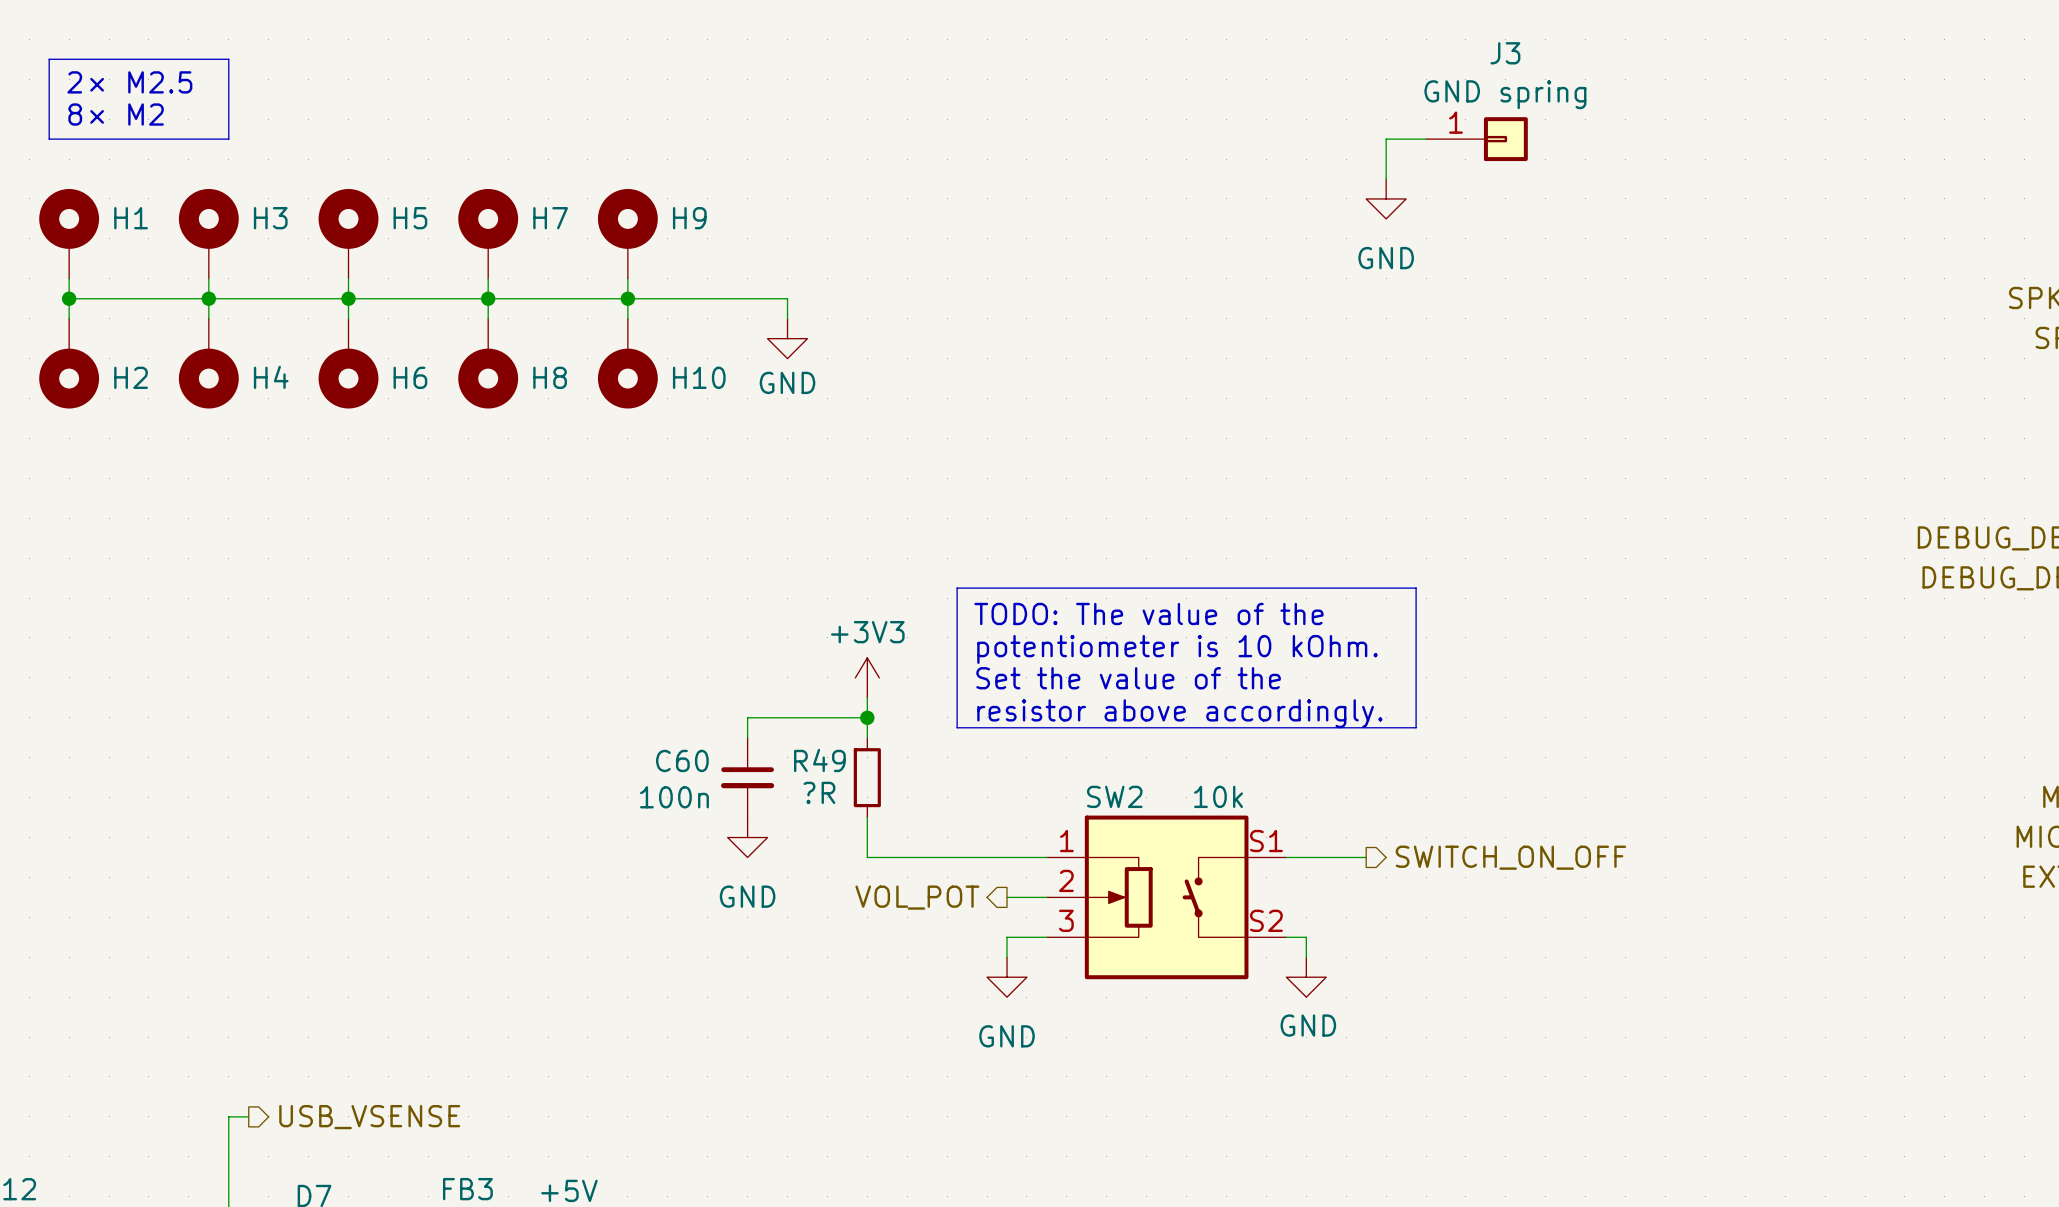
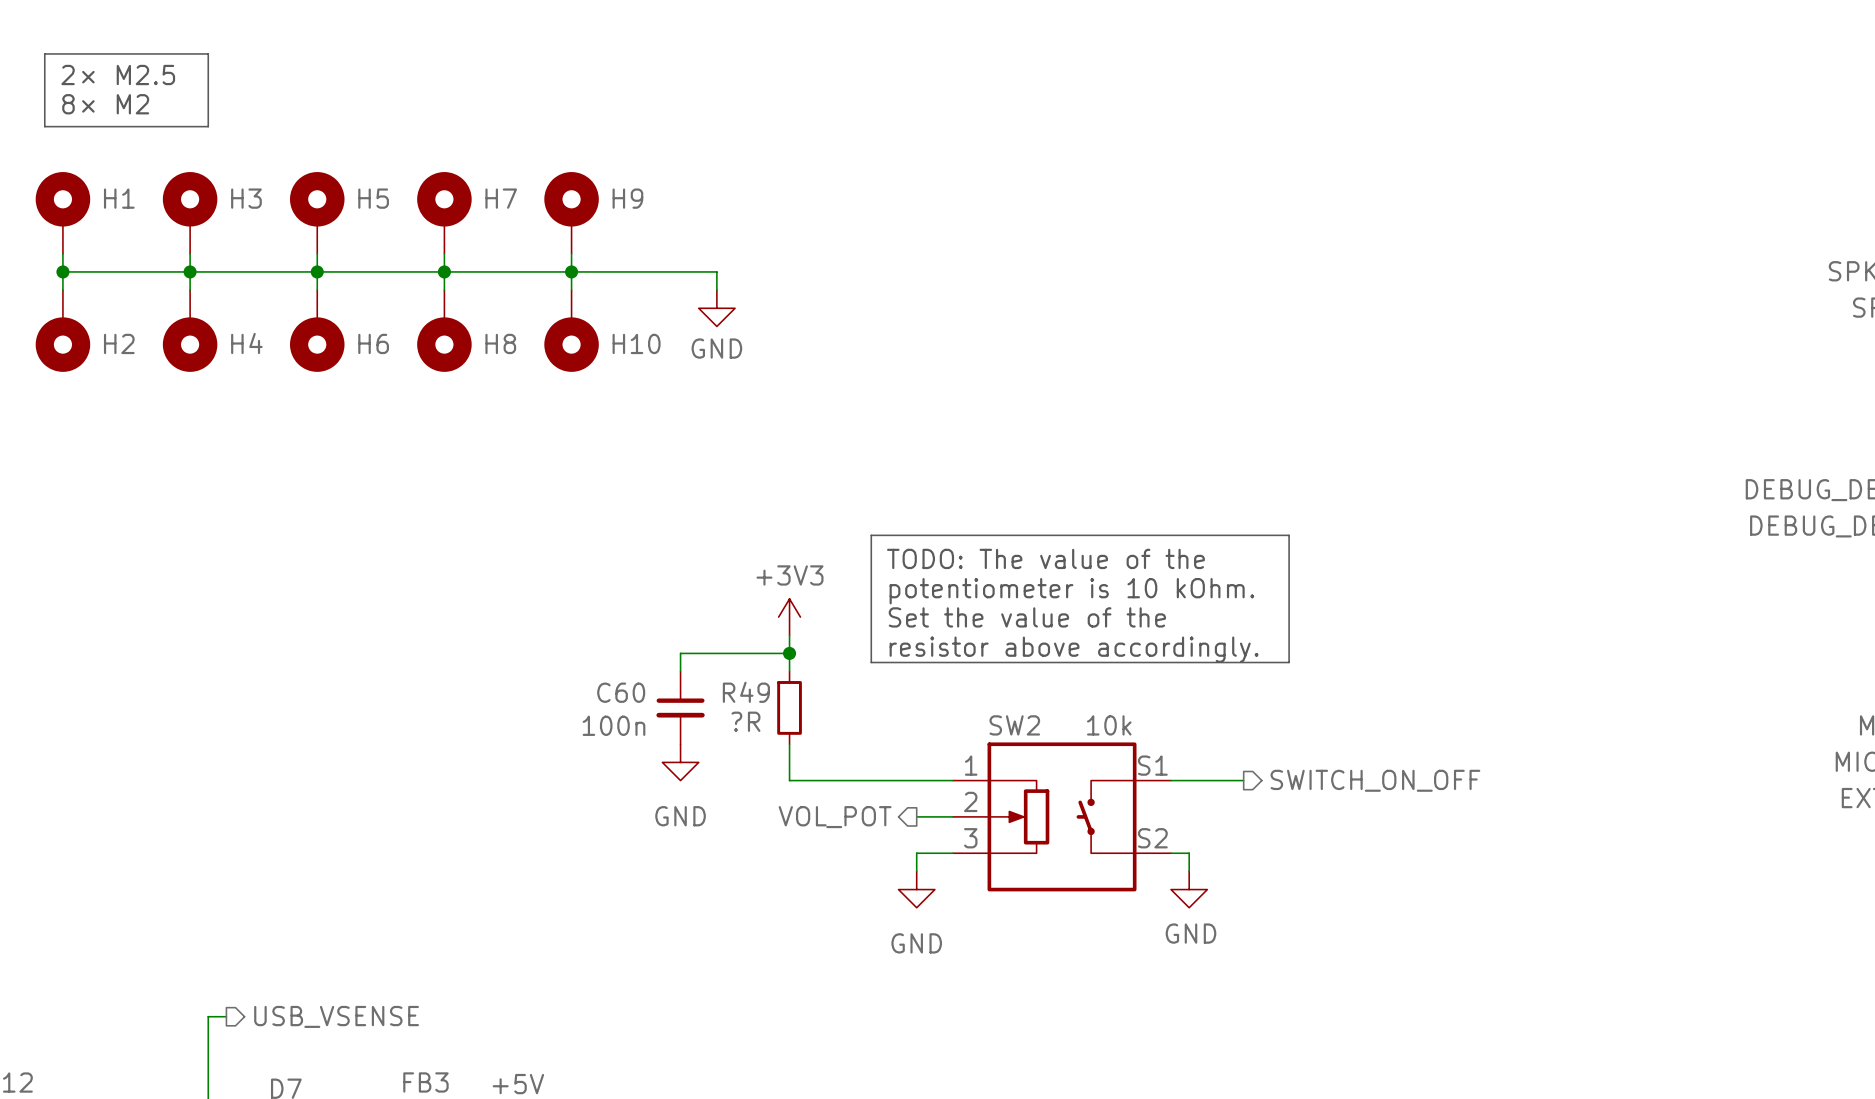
wire: (1426, 139) (1386, 139) (1386, 179) -> none
J3: GND spring (1476, 139) -> none
power symbol: GND (1386, 198) -> none

